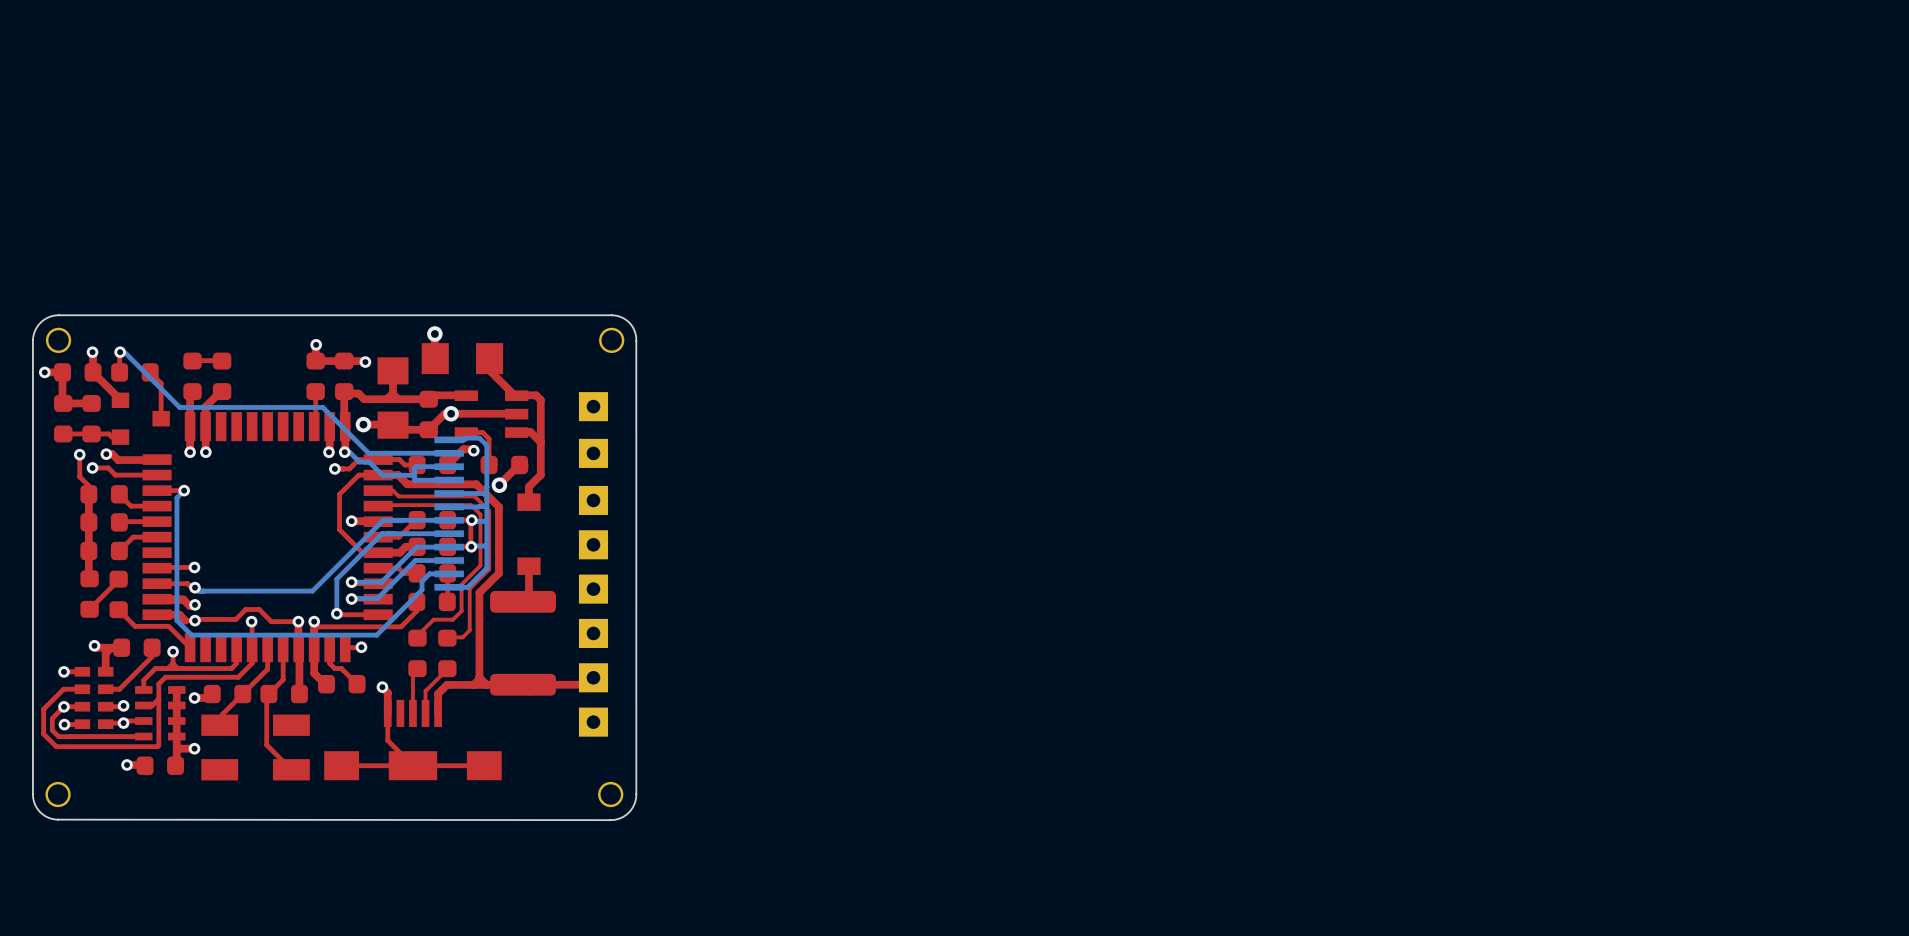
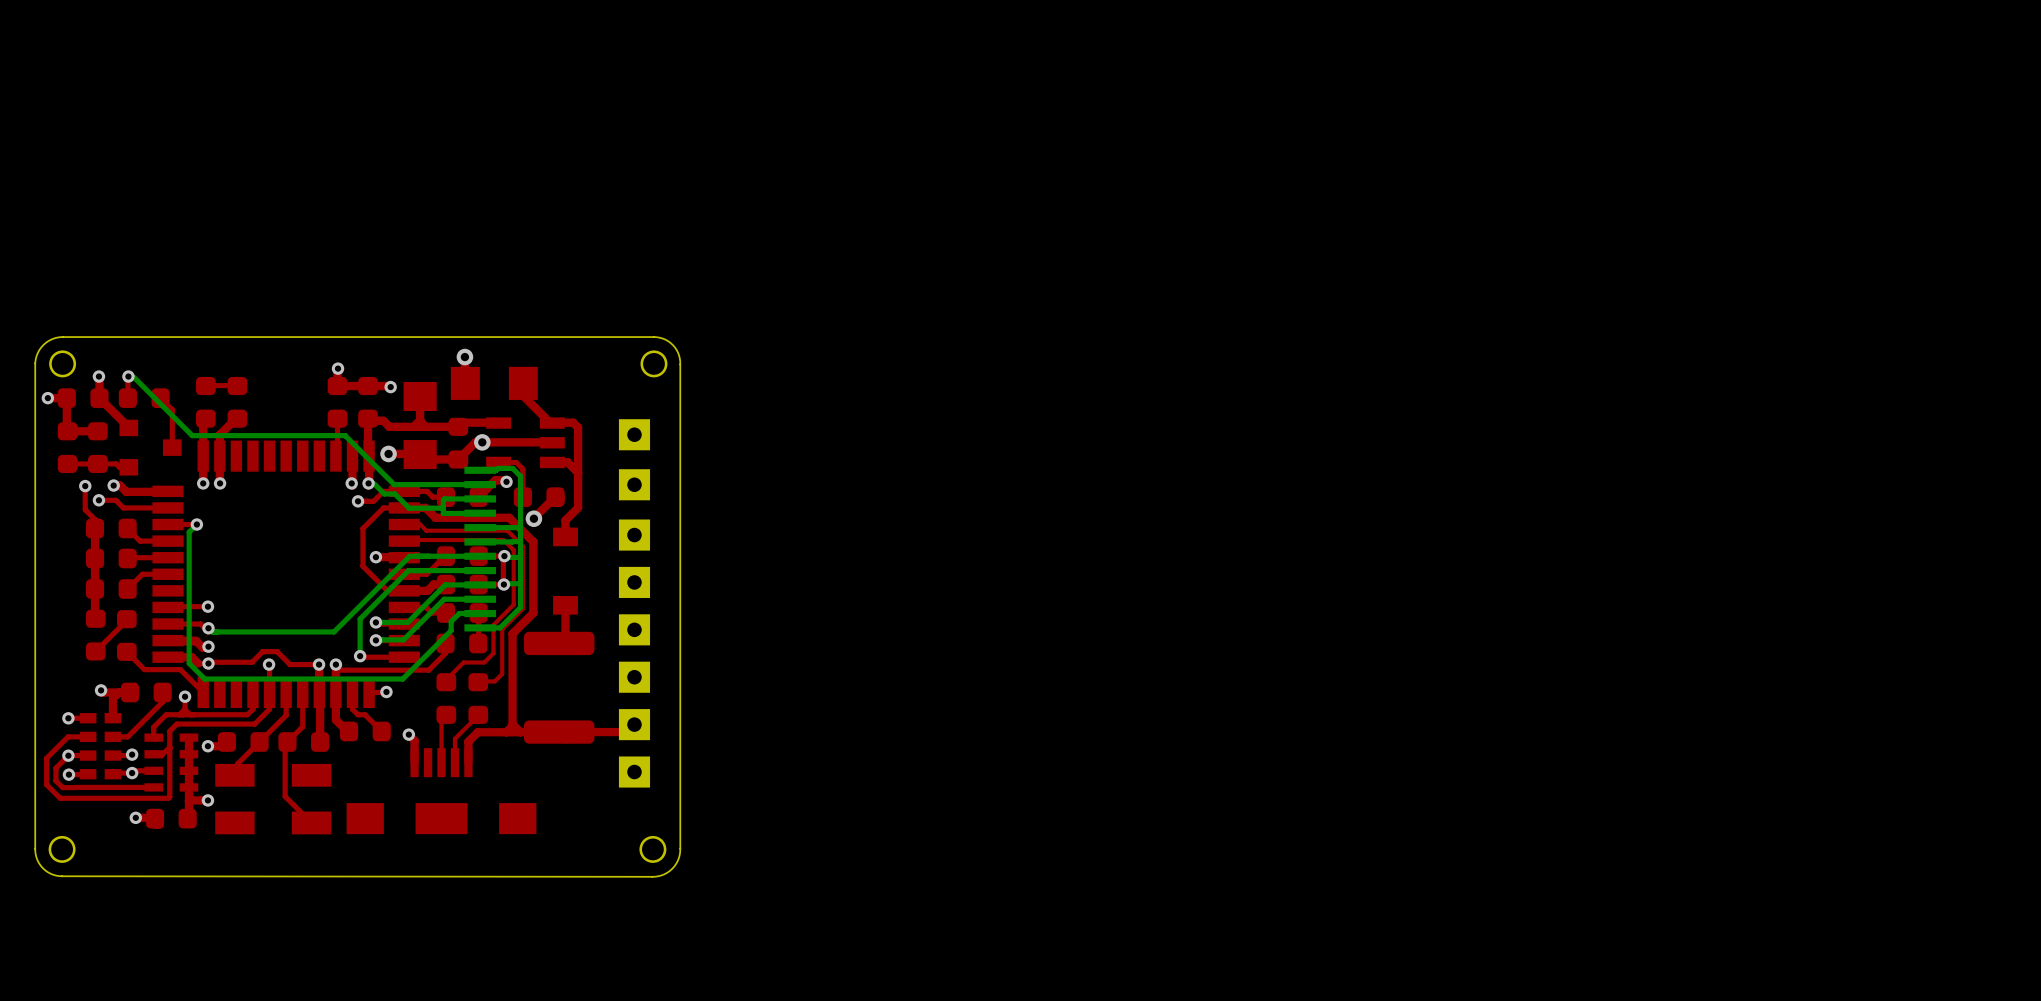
top track: (387, 713) (387, 740) (412, 765) -> none
top track: (484, 765) (341, 765) -> none

